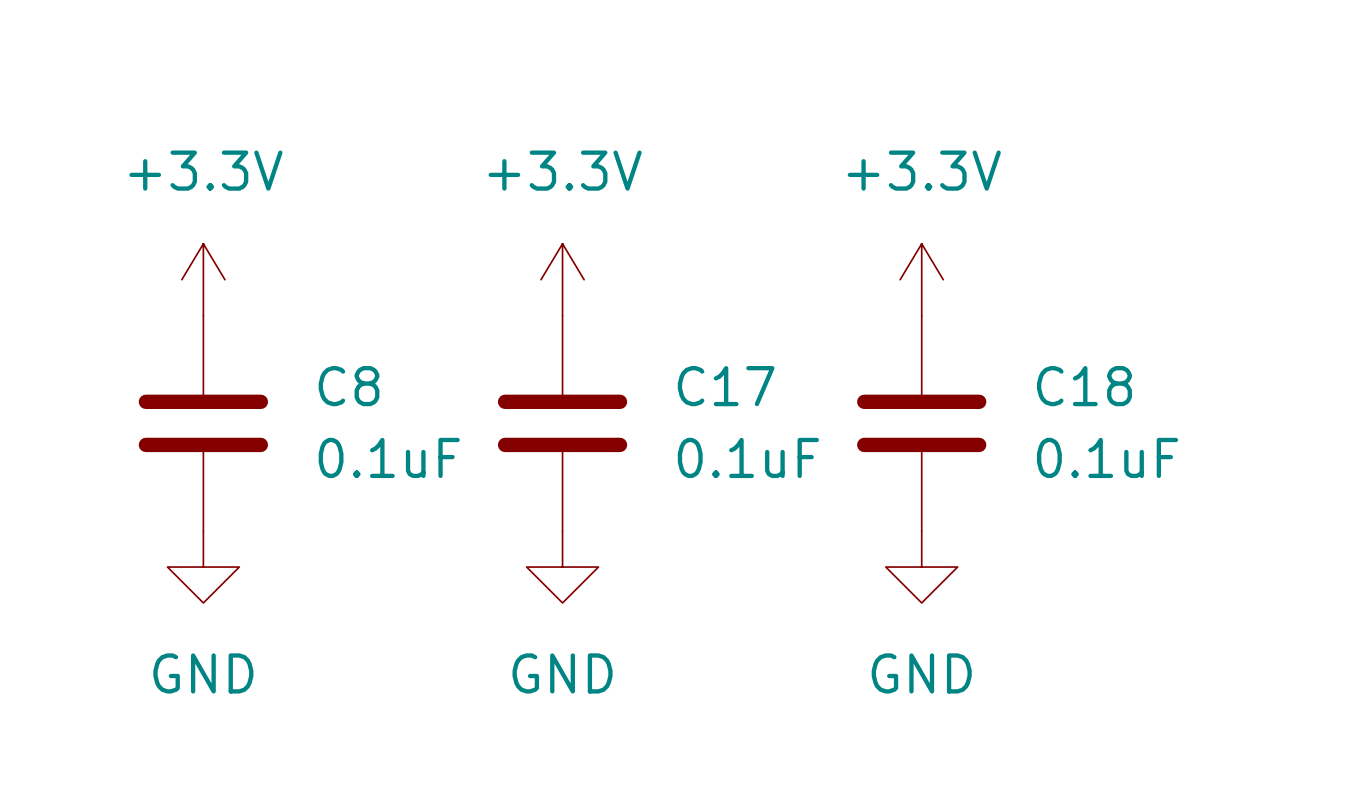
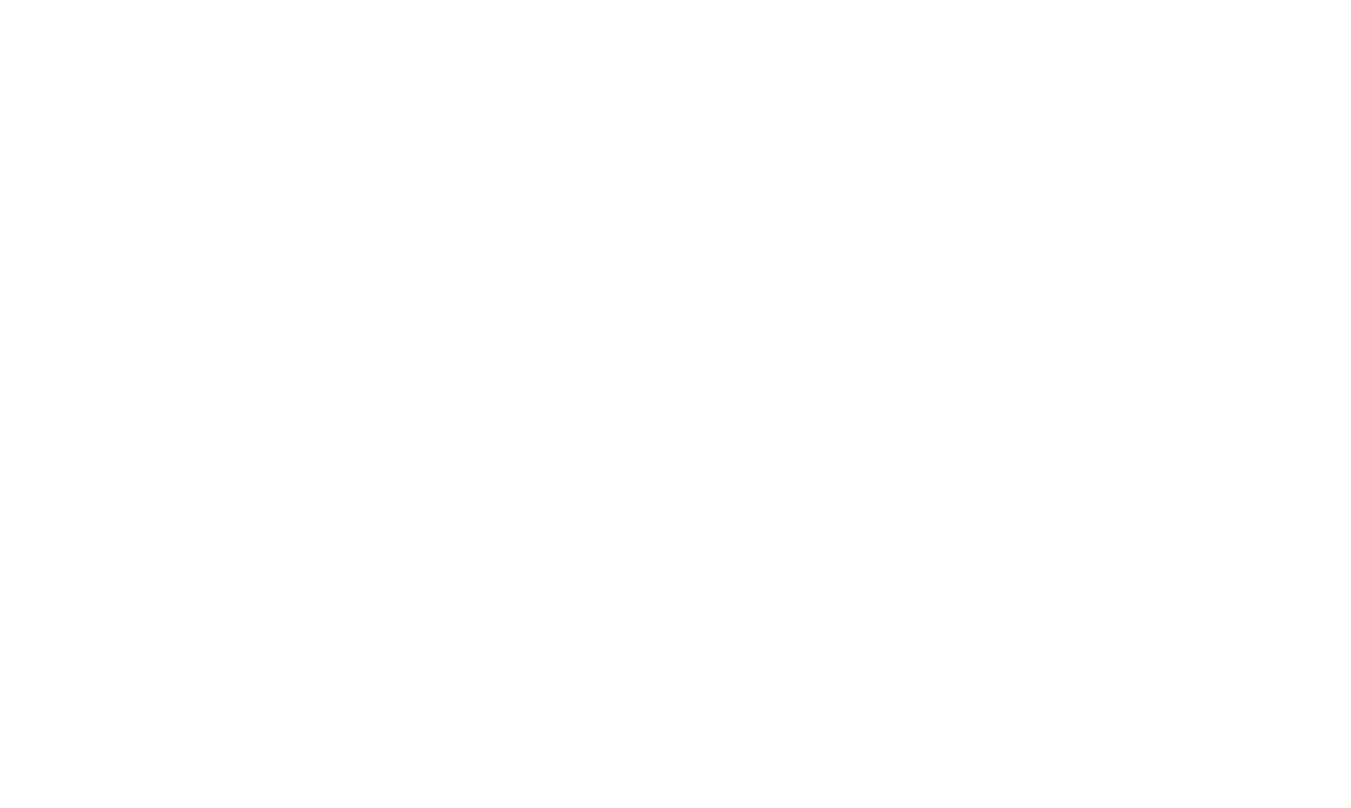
power symbol: +3.3V (203, 279) -> none
power symbol: +3.3V (562, 279) -> none
power symbol: +3.3V (921, 279) -> none
C8: 0.1uF (203, 423) -> none
C17: 0.1uF (562, 423) -> none
C18: 0.1uF (921, 423) -> none
power symbol: GND (203, 567) -> none
power symbol: GND (562, 567) -> none
power symbol: GND (921, 567) -> none

